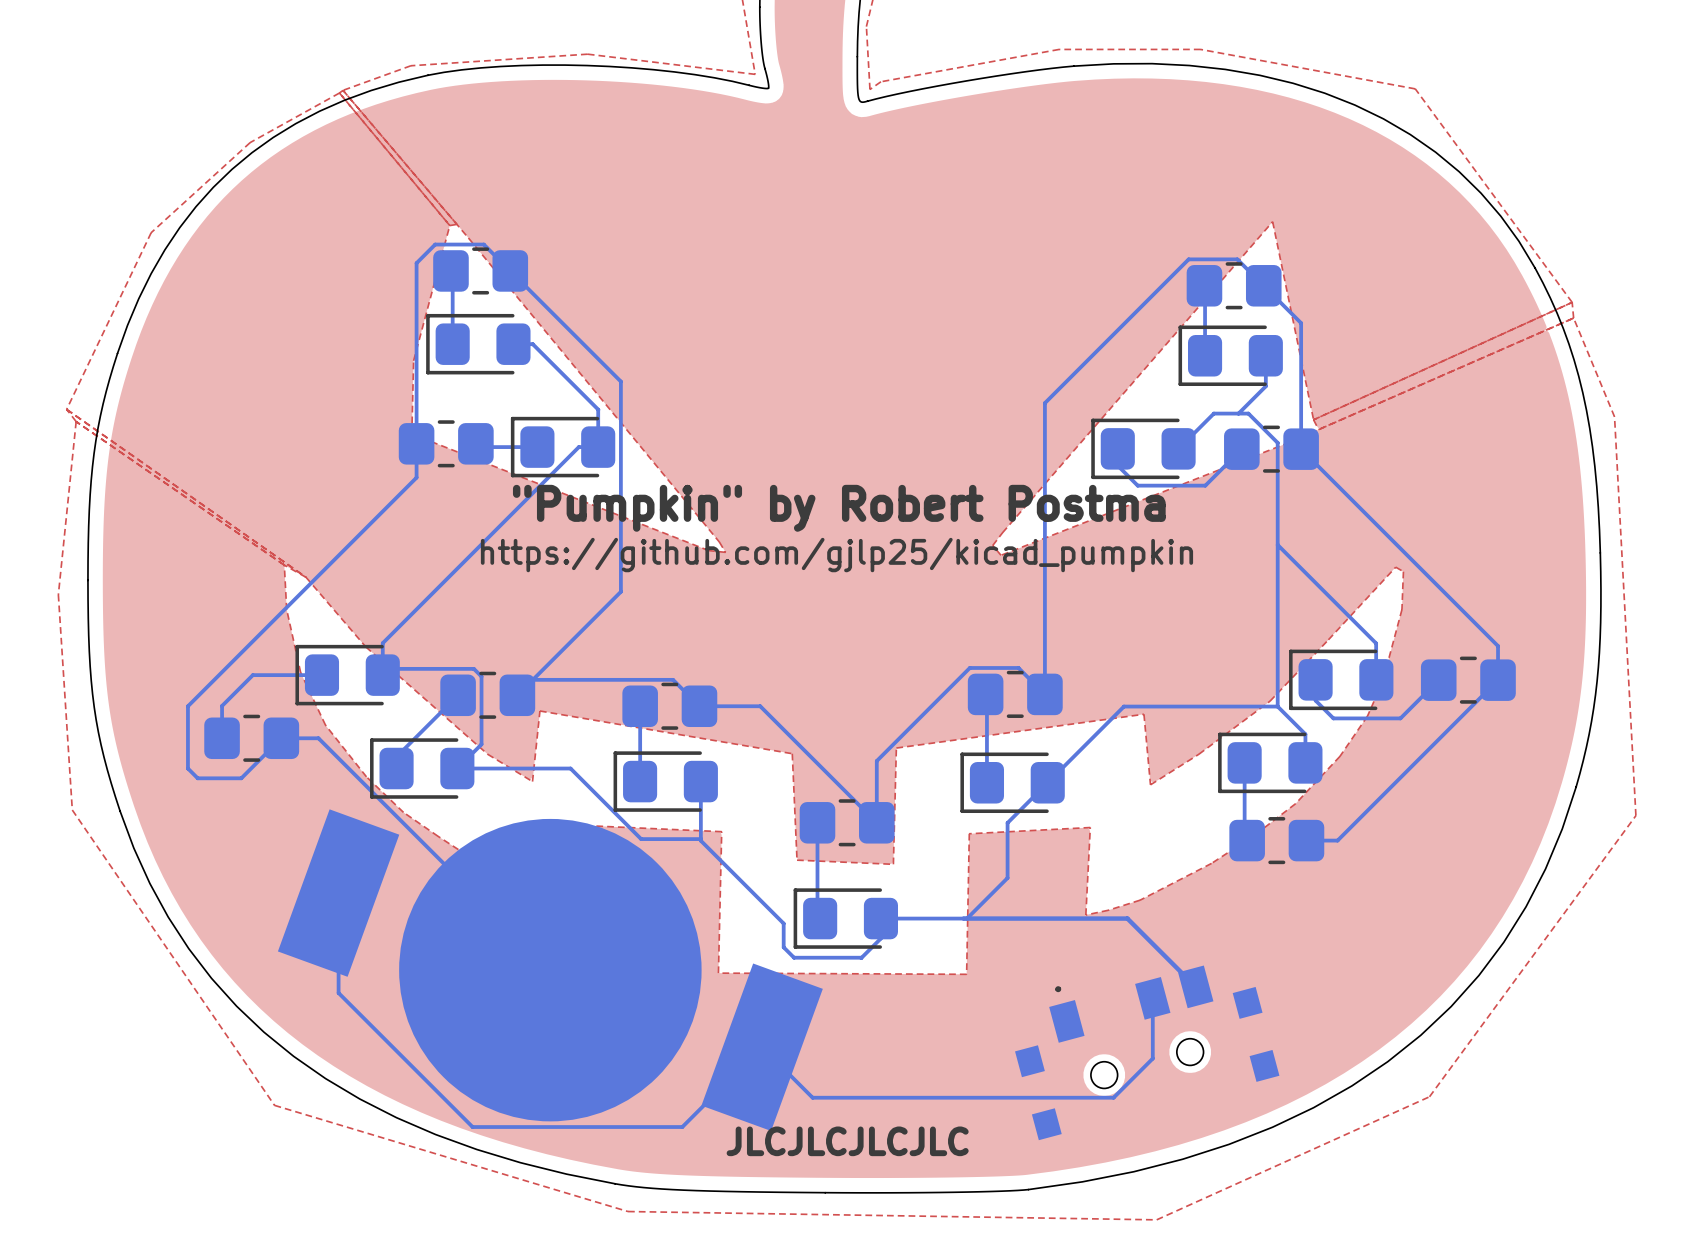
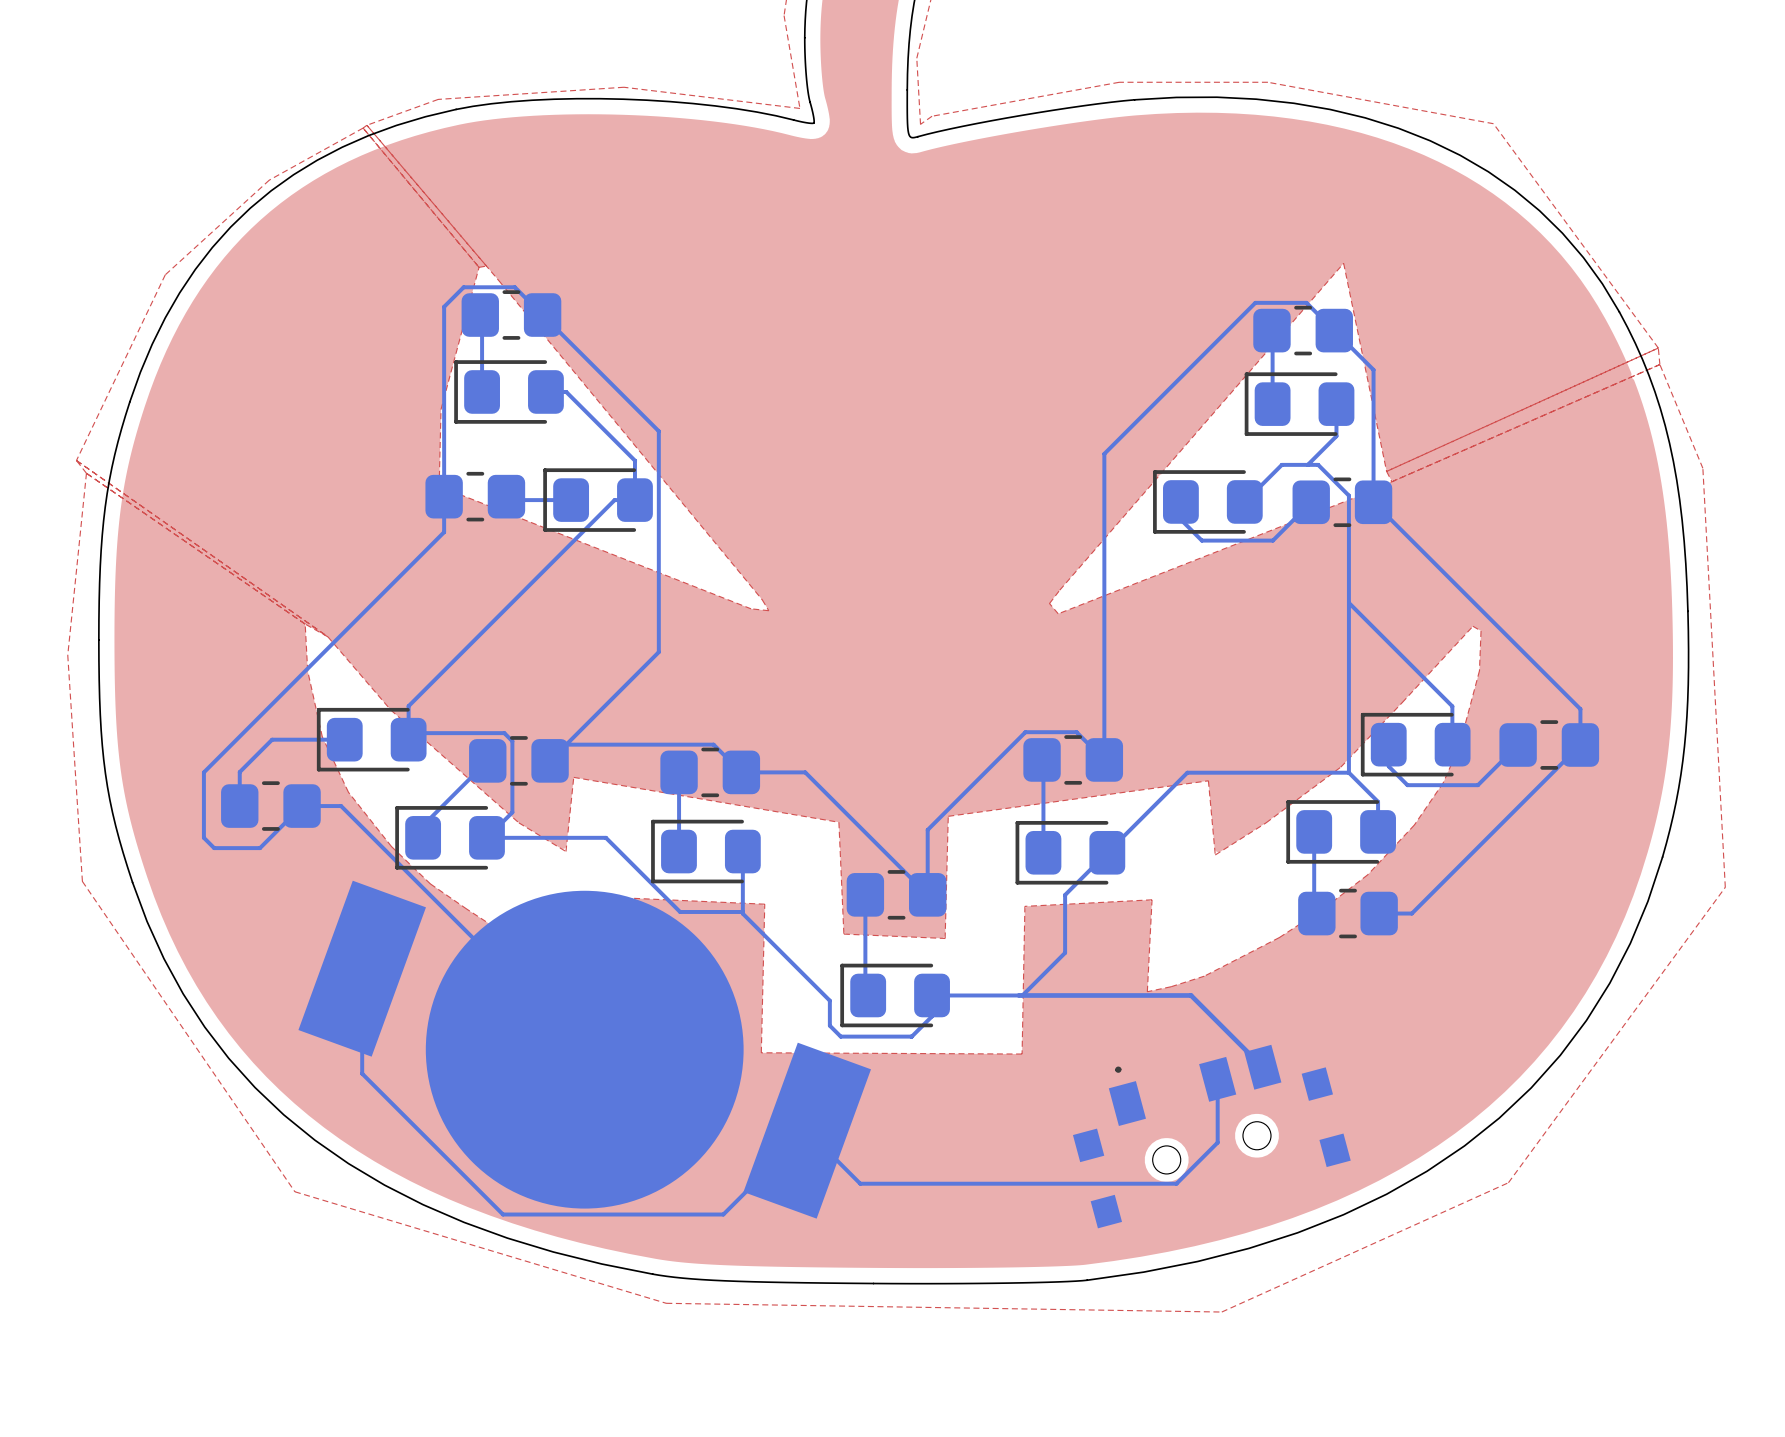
text: "Pumpkin" by Robert Postma (839, 508) -> none
text: https://github.com/gjlp25/kicad_pumpkin (836, 555) -> none
text: JLCJLCJLCJLC (847, 1141) -> none

